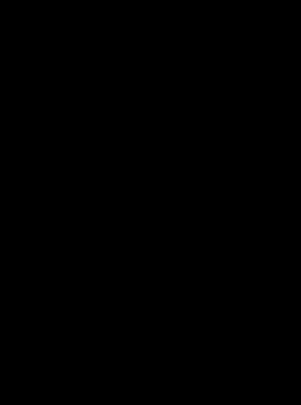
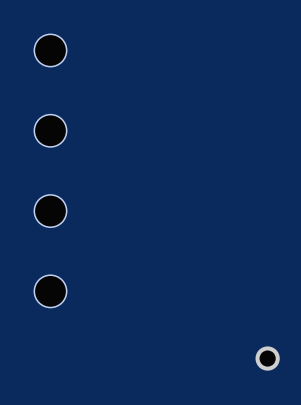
part: none -> (50, 50)
part: none -> (50, 130)
part: none -> (50, 211)
part: none -> (50, 291)
part: none -> (267, 358)

